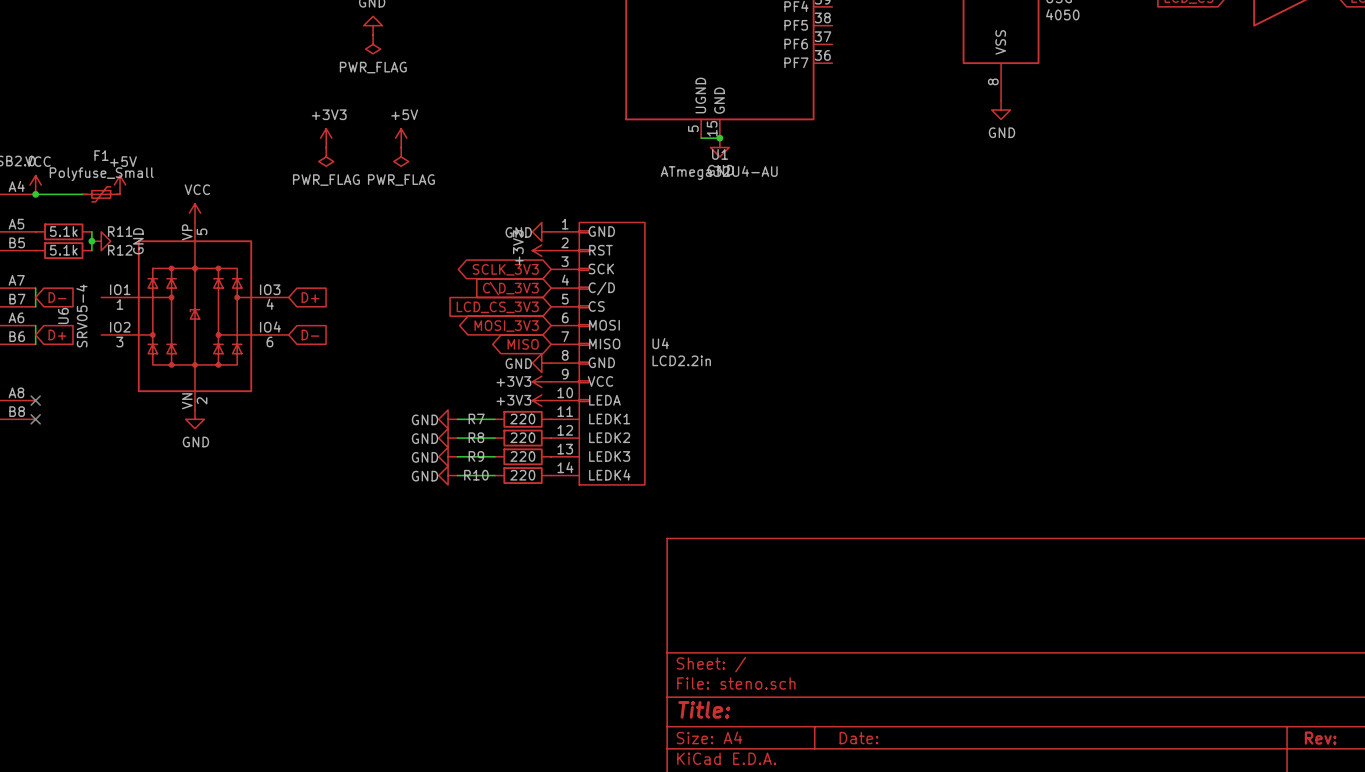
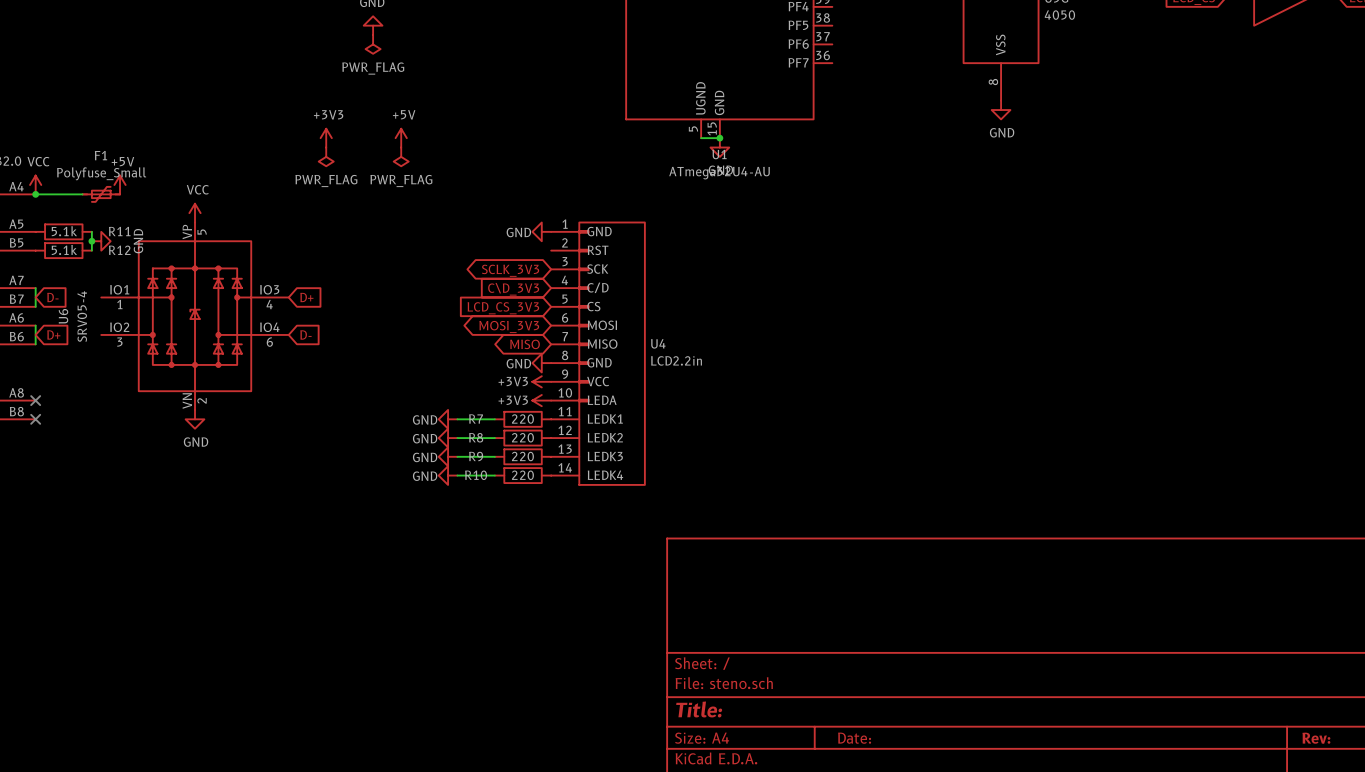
power symbol: +3V3 (541, 250) -> none

